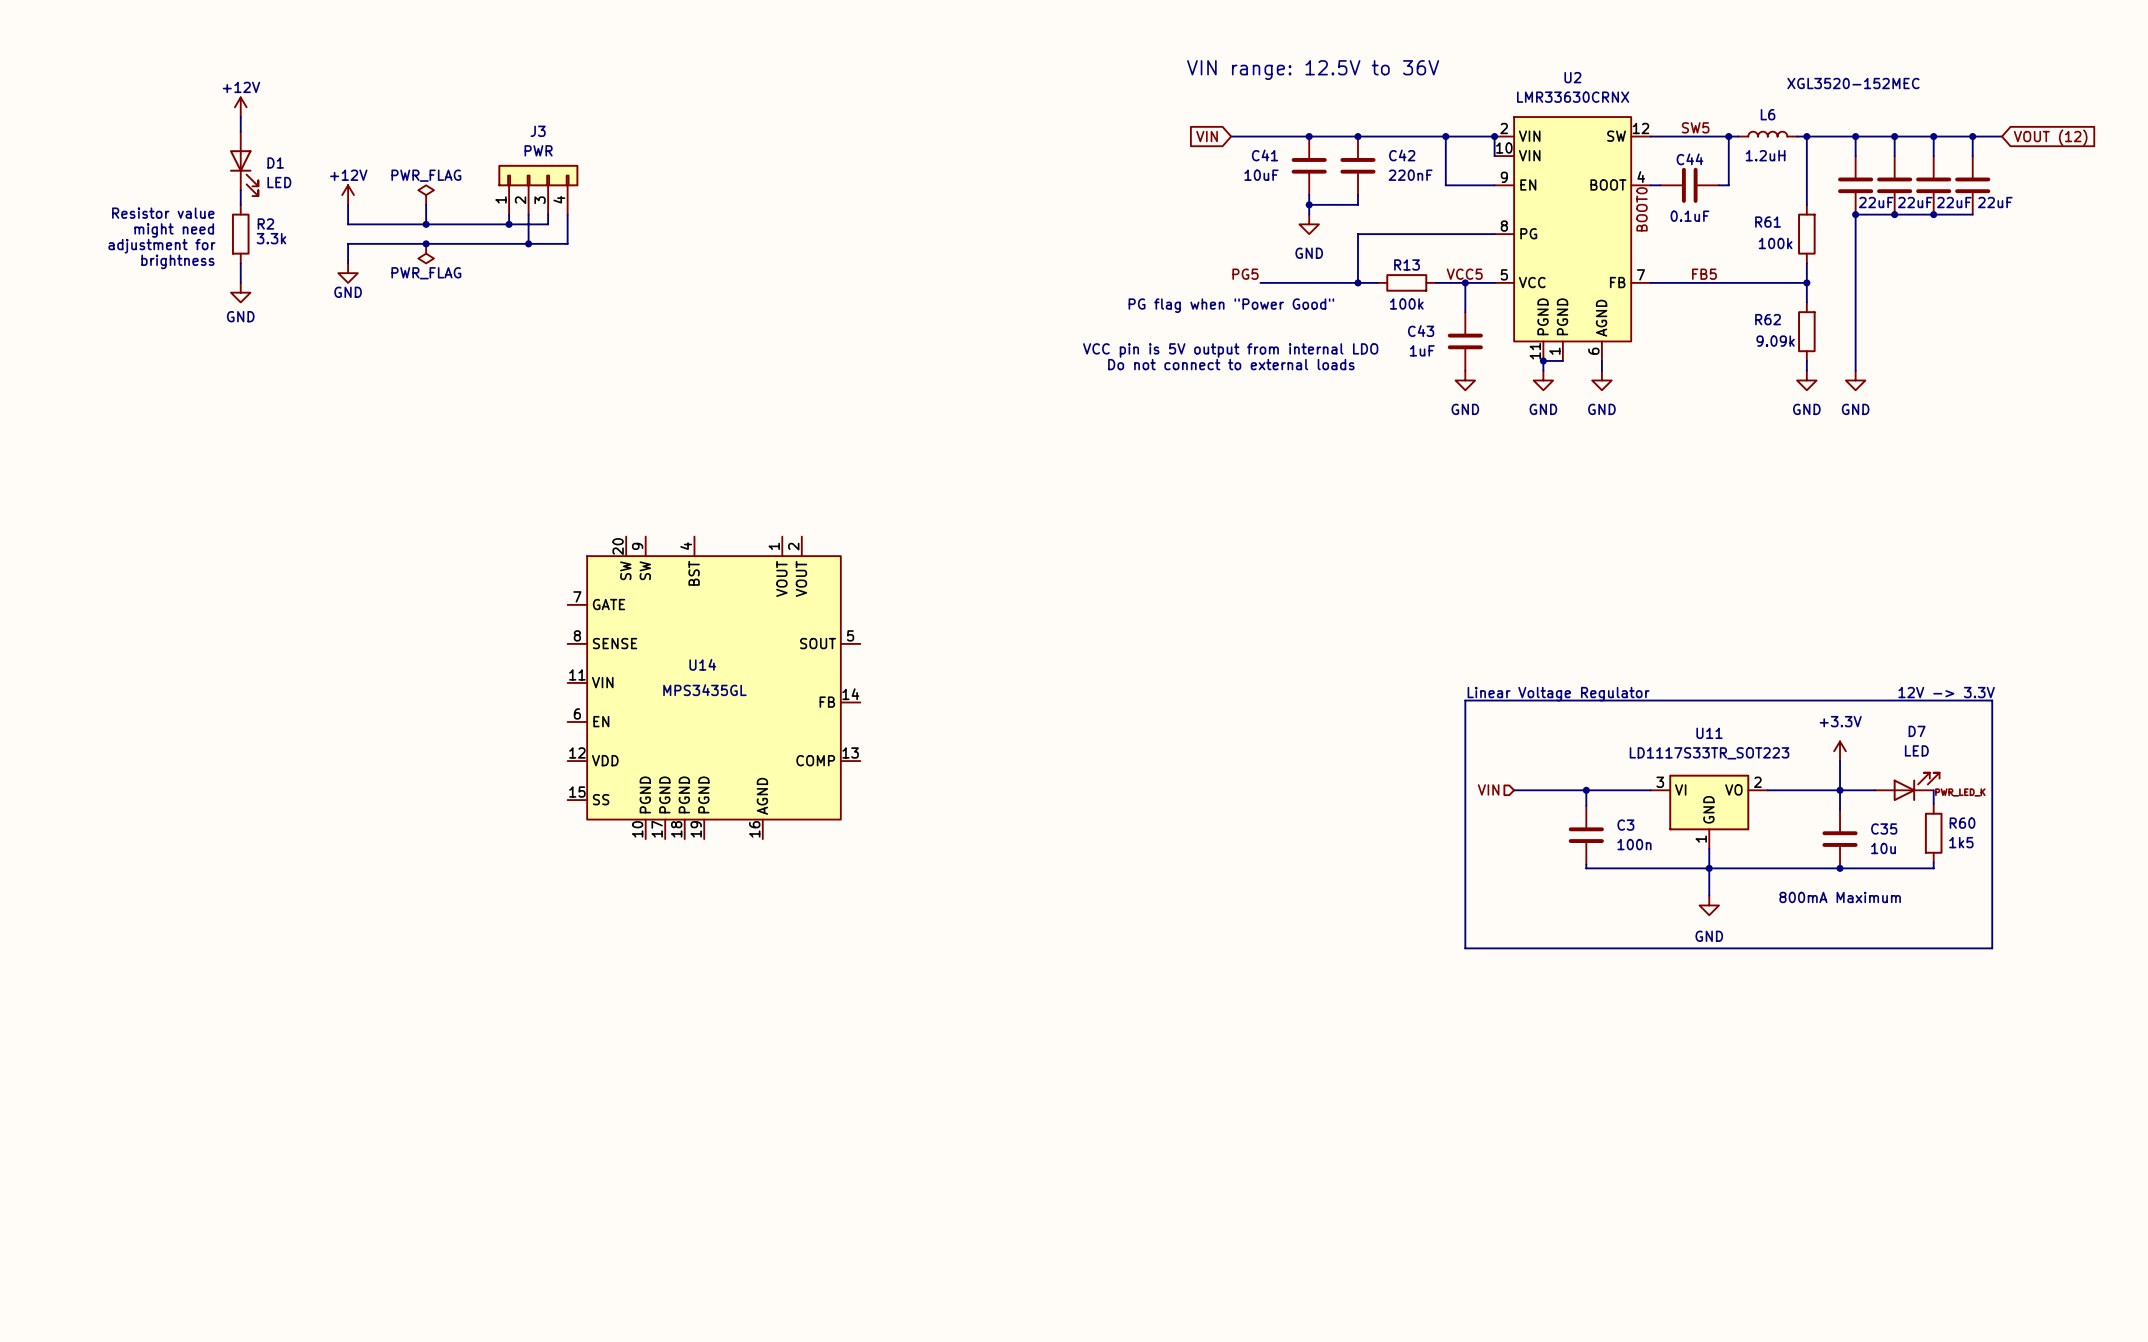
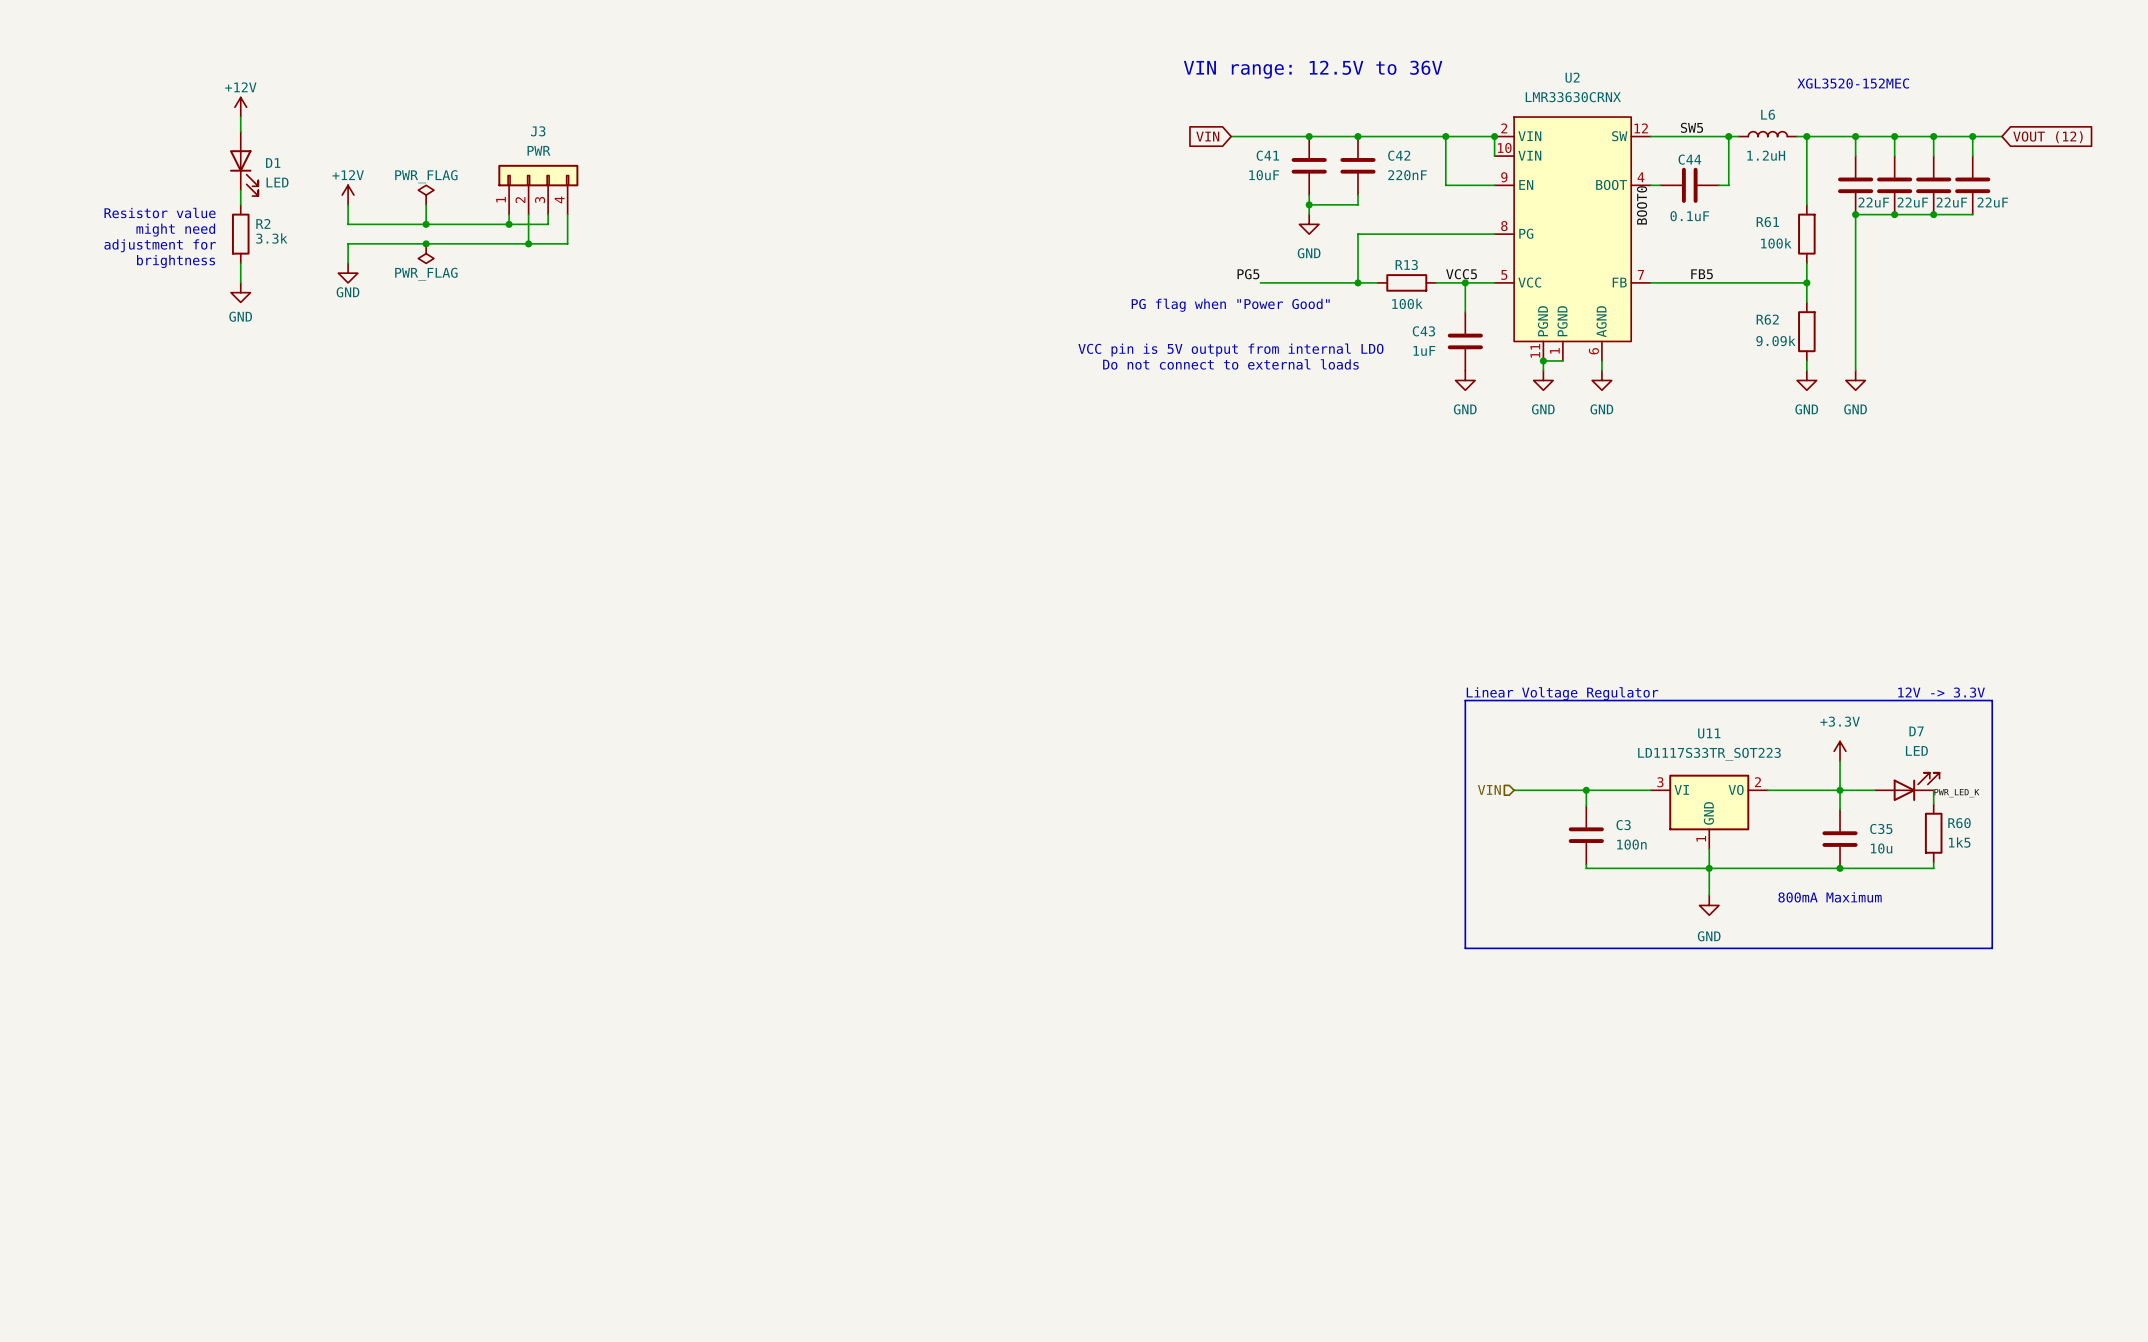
U14: MPS3435GL (713, 687) -> none

